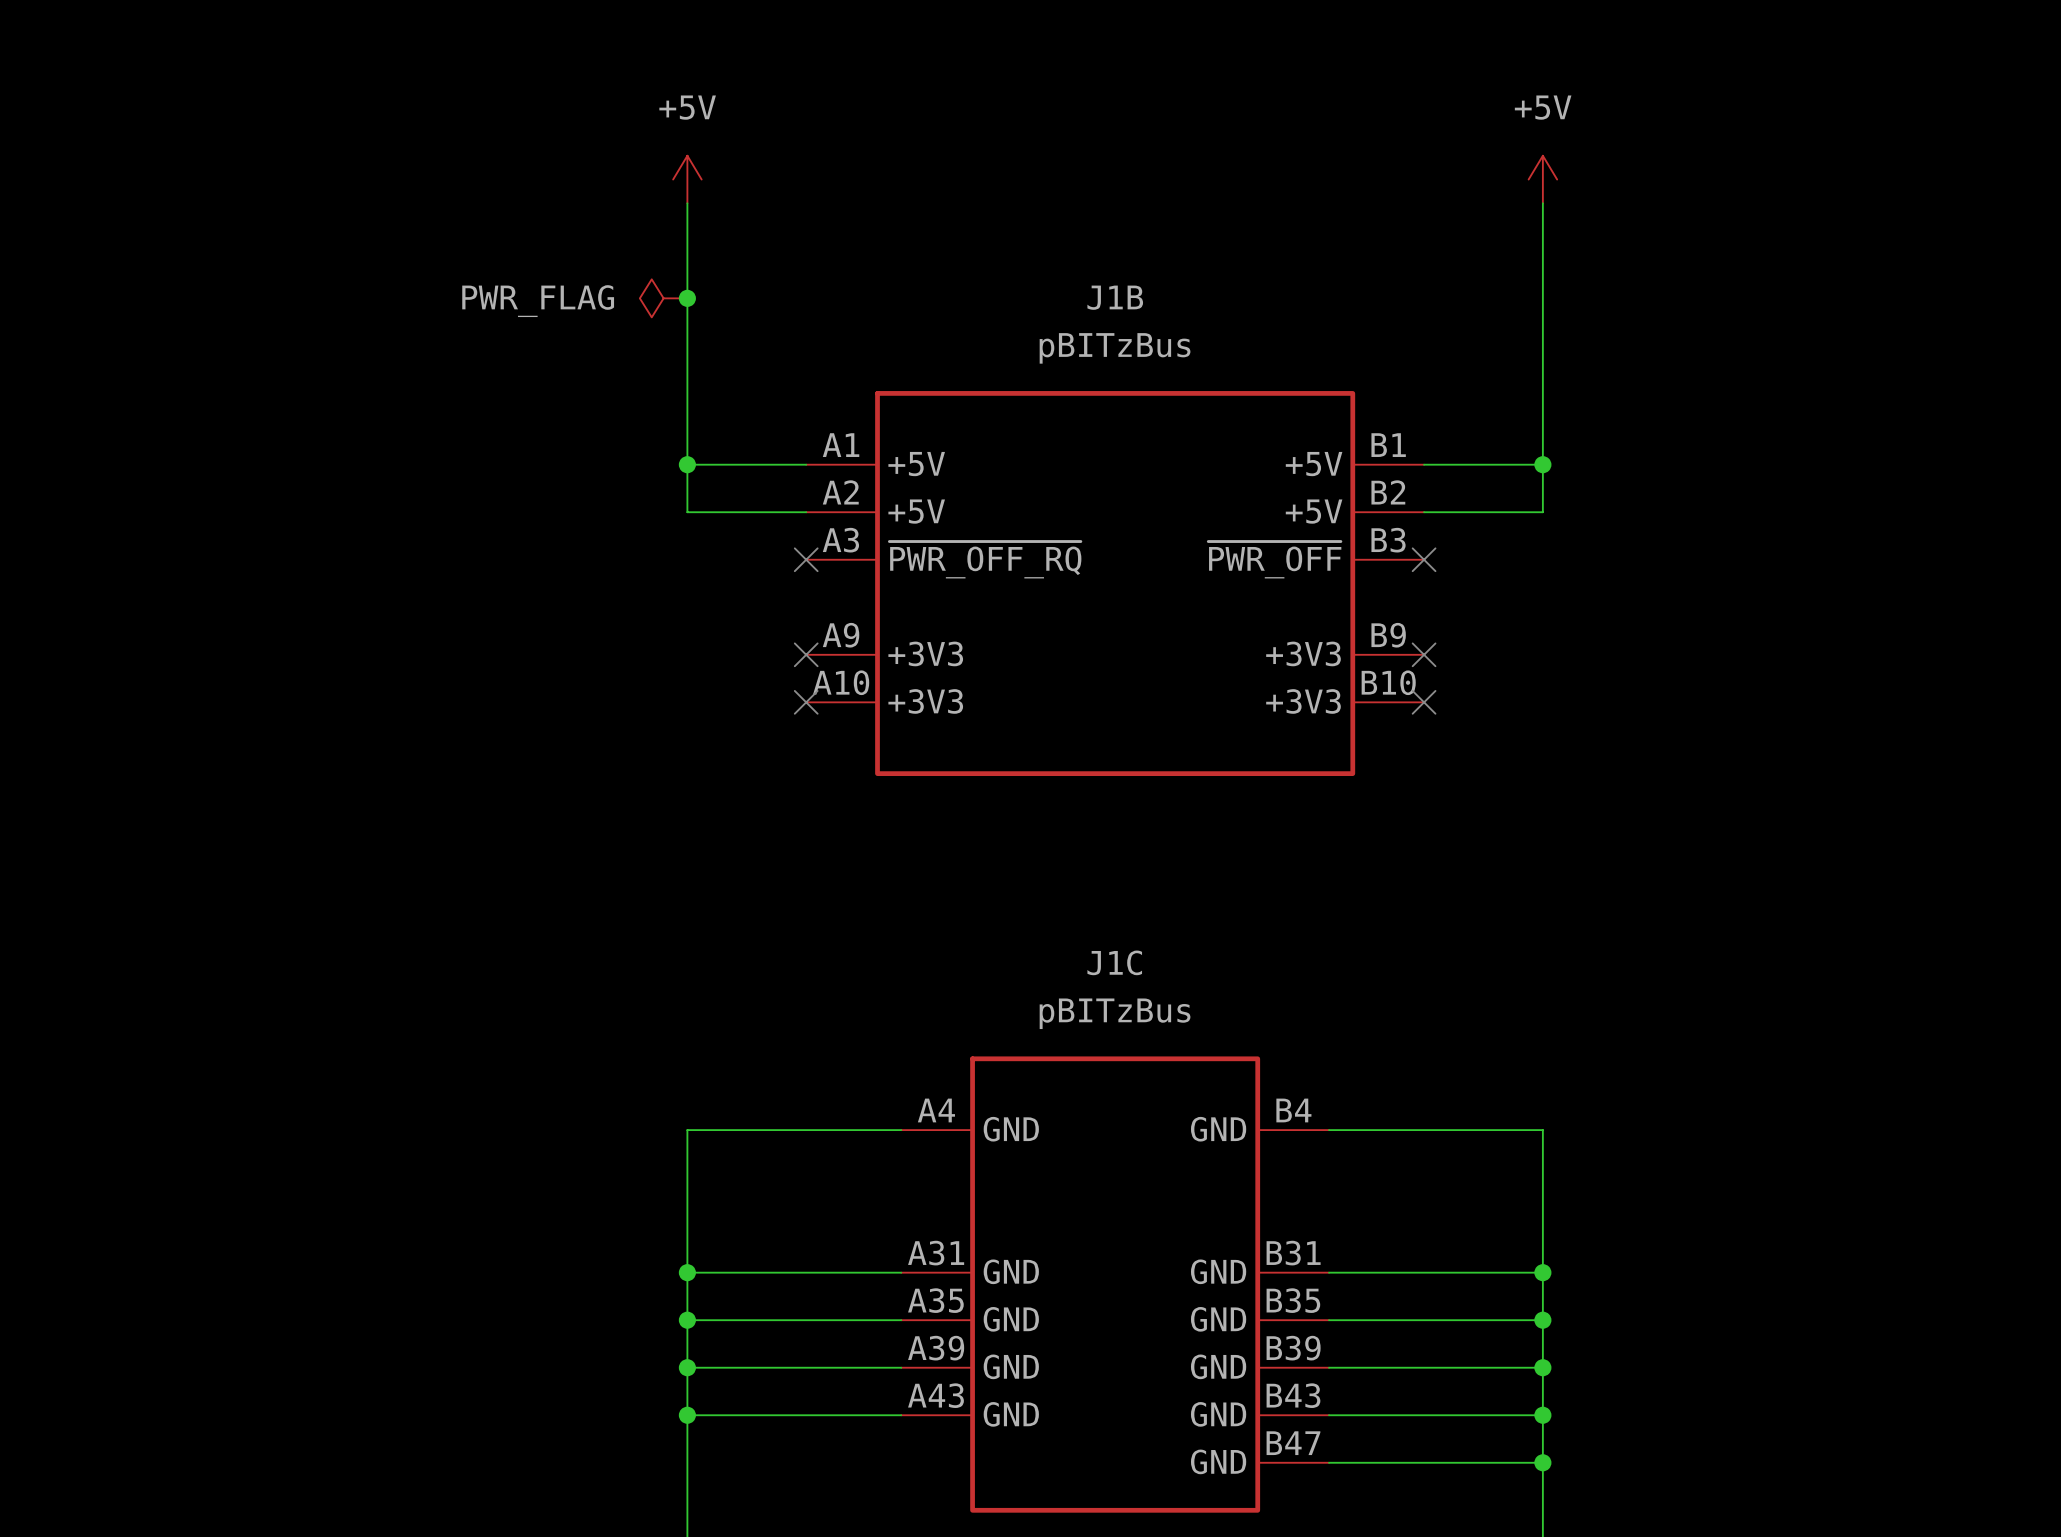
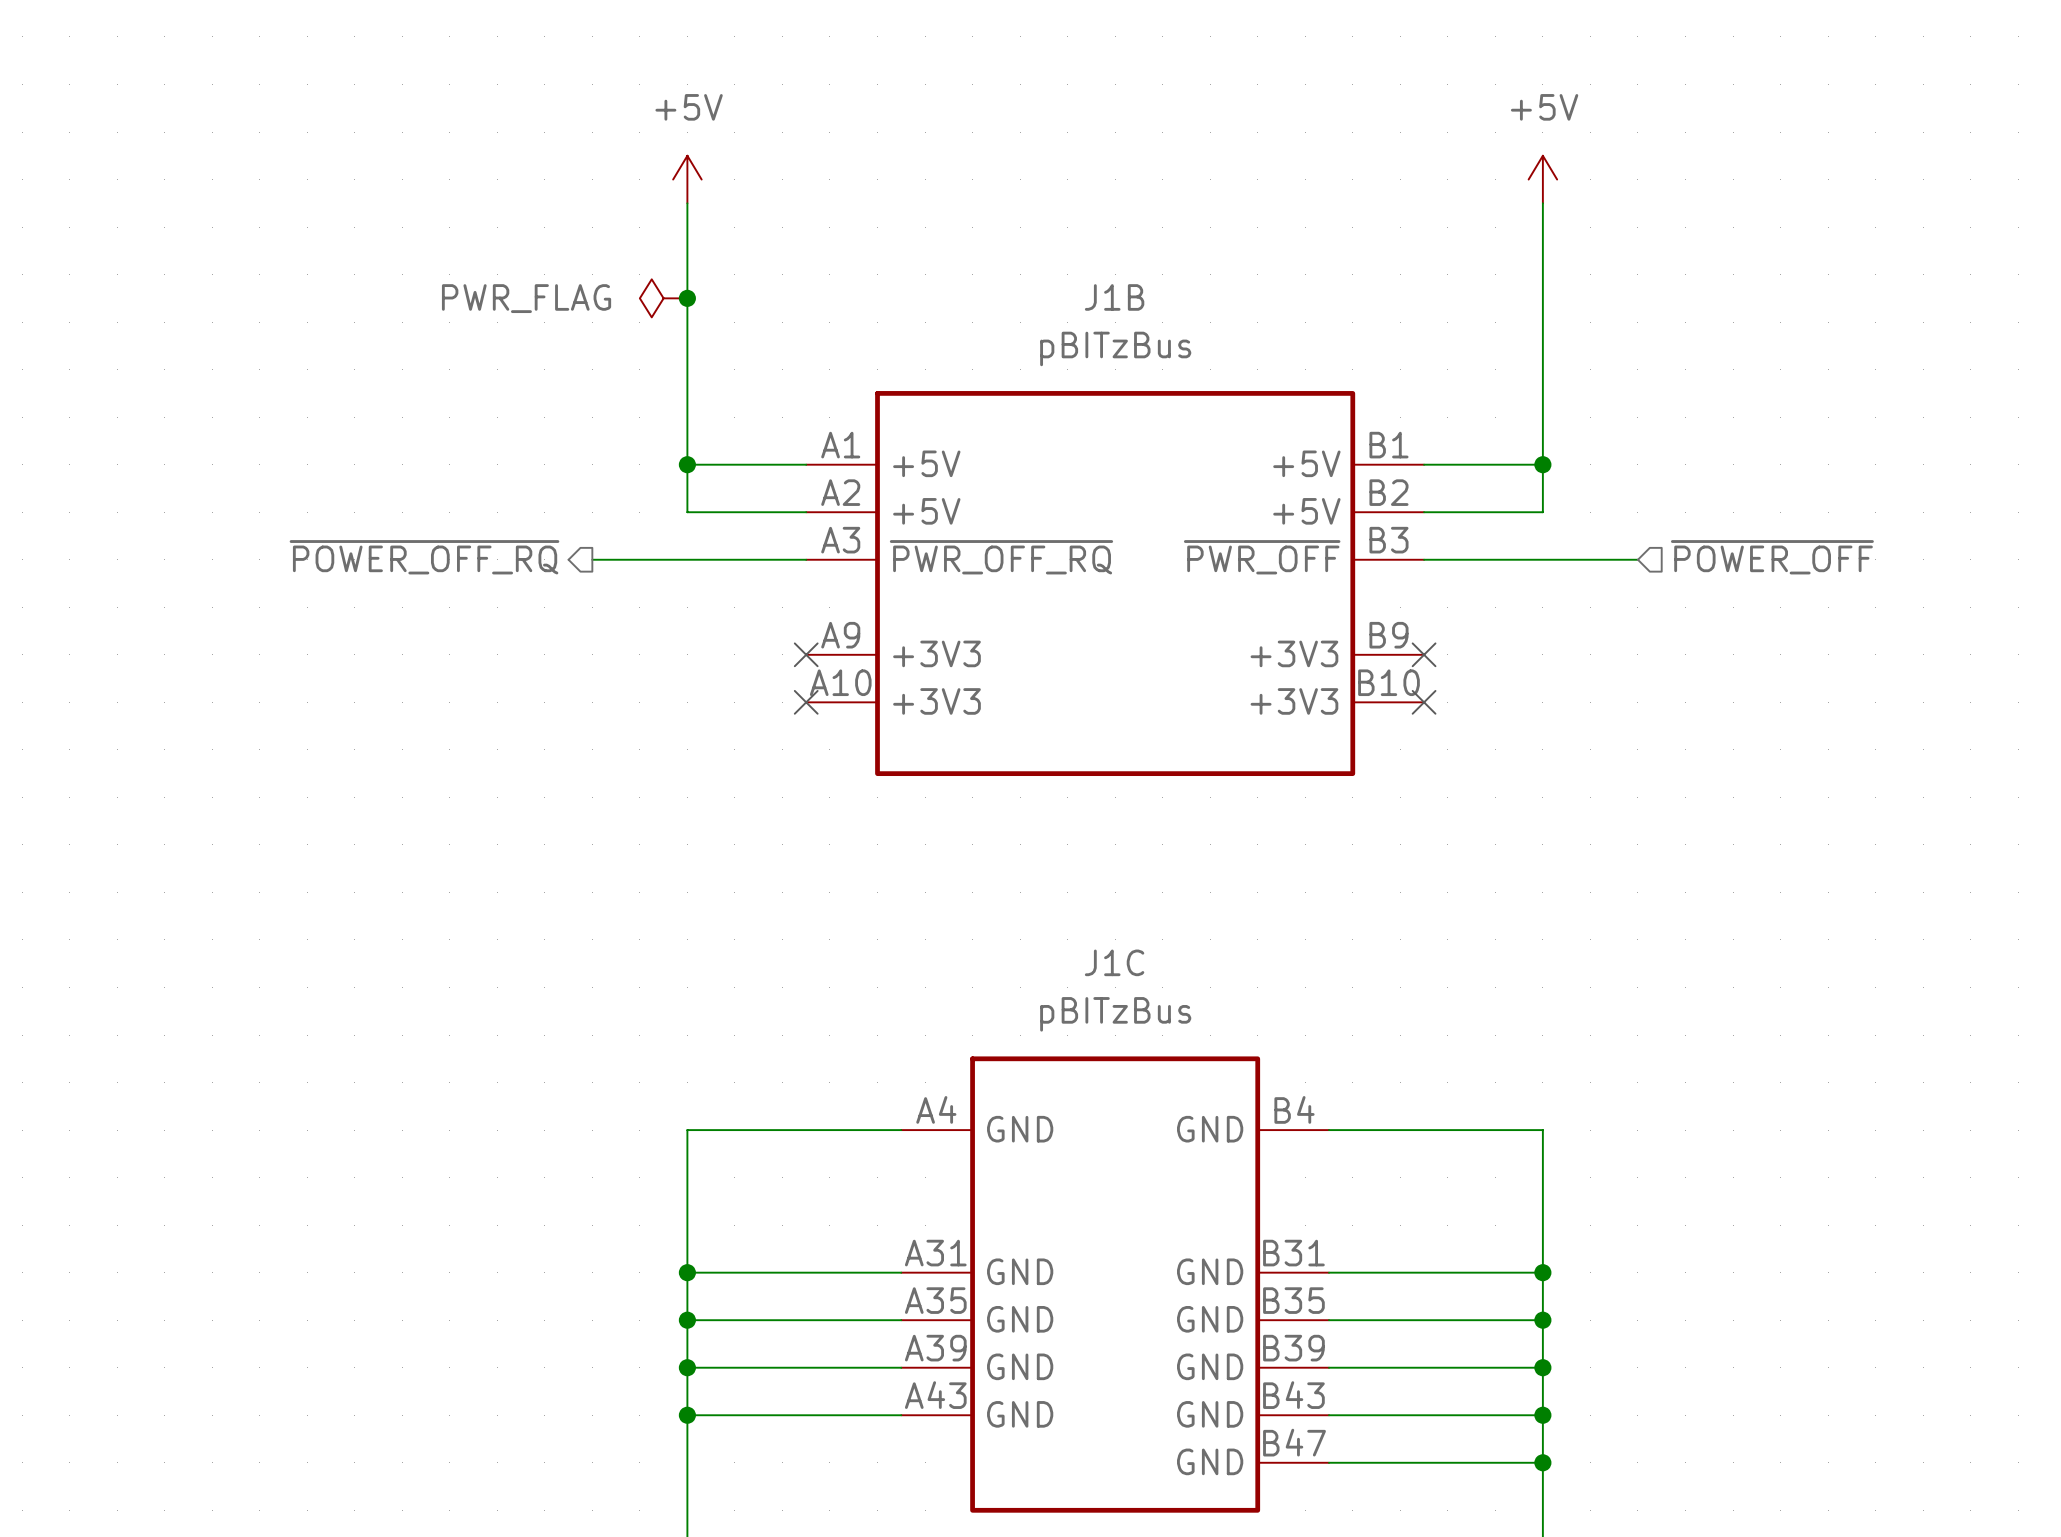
hierarchical label: none -> ~{POWER_OFF_RQ} (424, 557)
wire: none -> (592, 559) (806, 559)
no-connect mark: (806, 559) -> none
wire: none -> (1424, 559) (1637, 559)
no-connect mark: (1424, 559) -> none
hierarchical label: none -> ~{POWER_OFF} (1772, 557)

